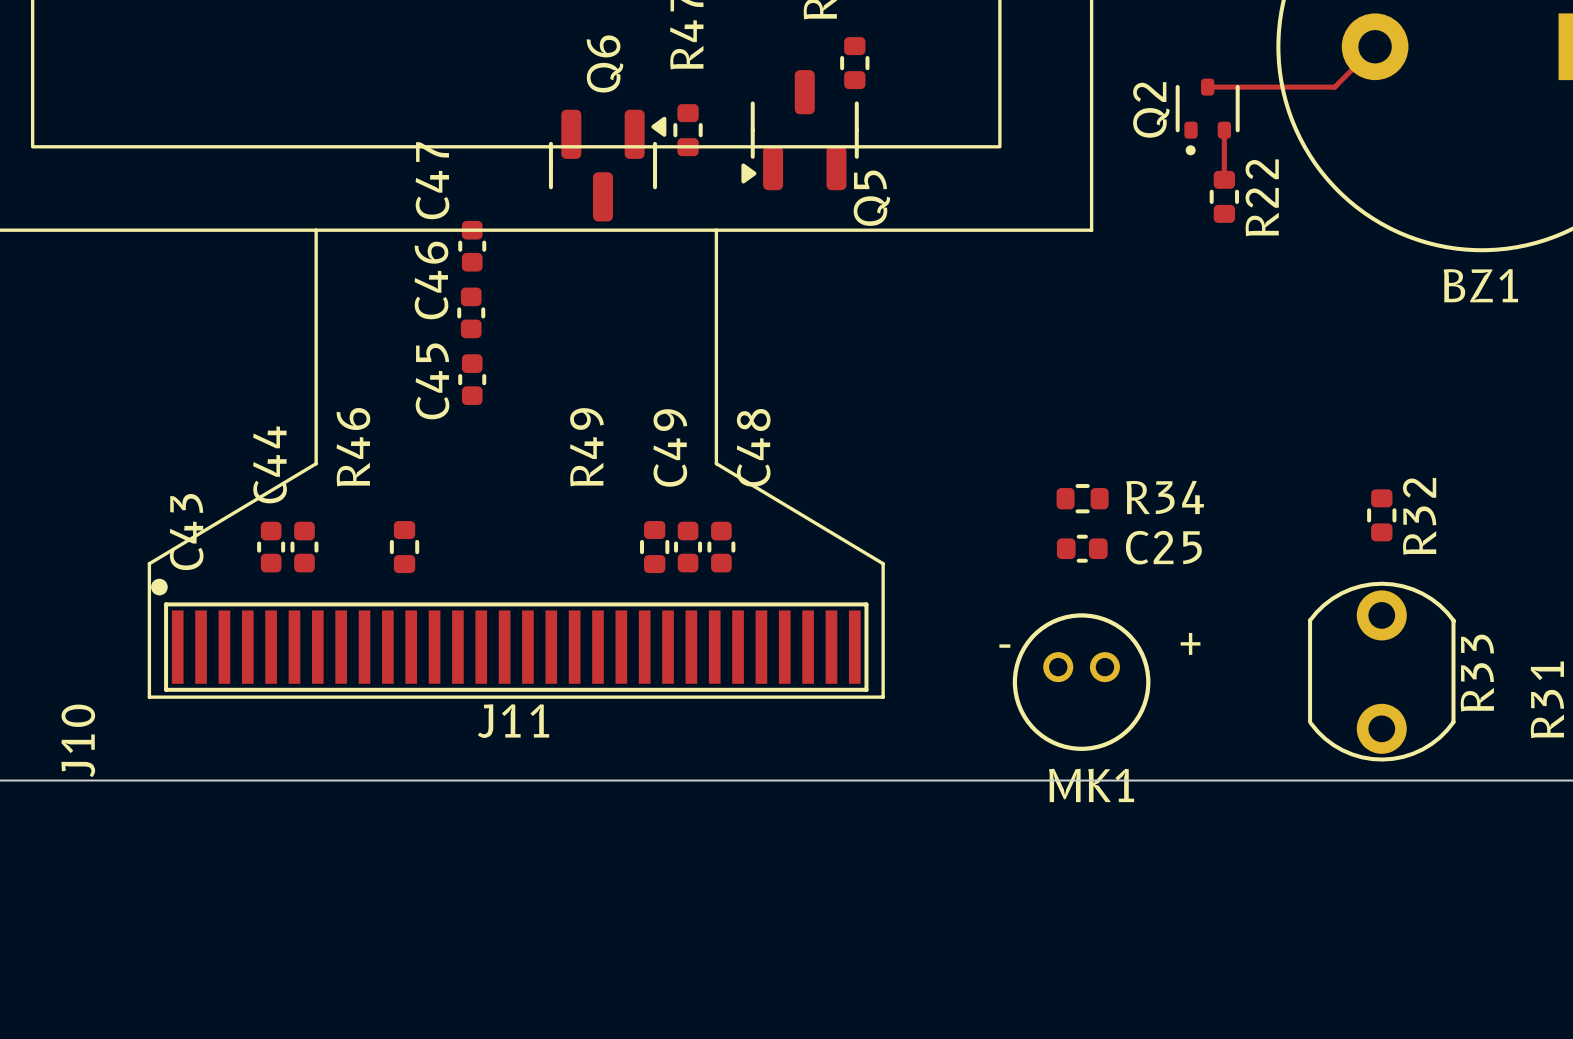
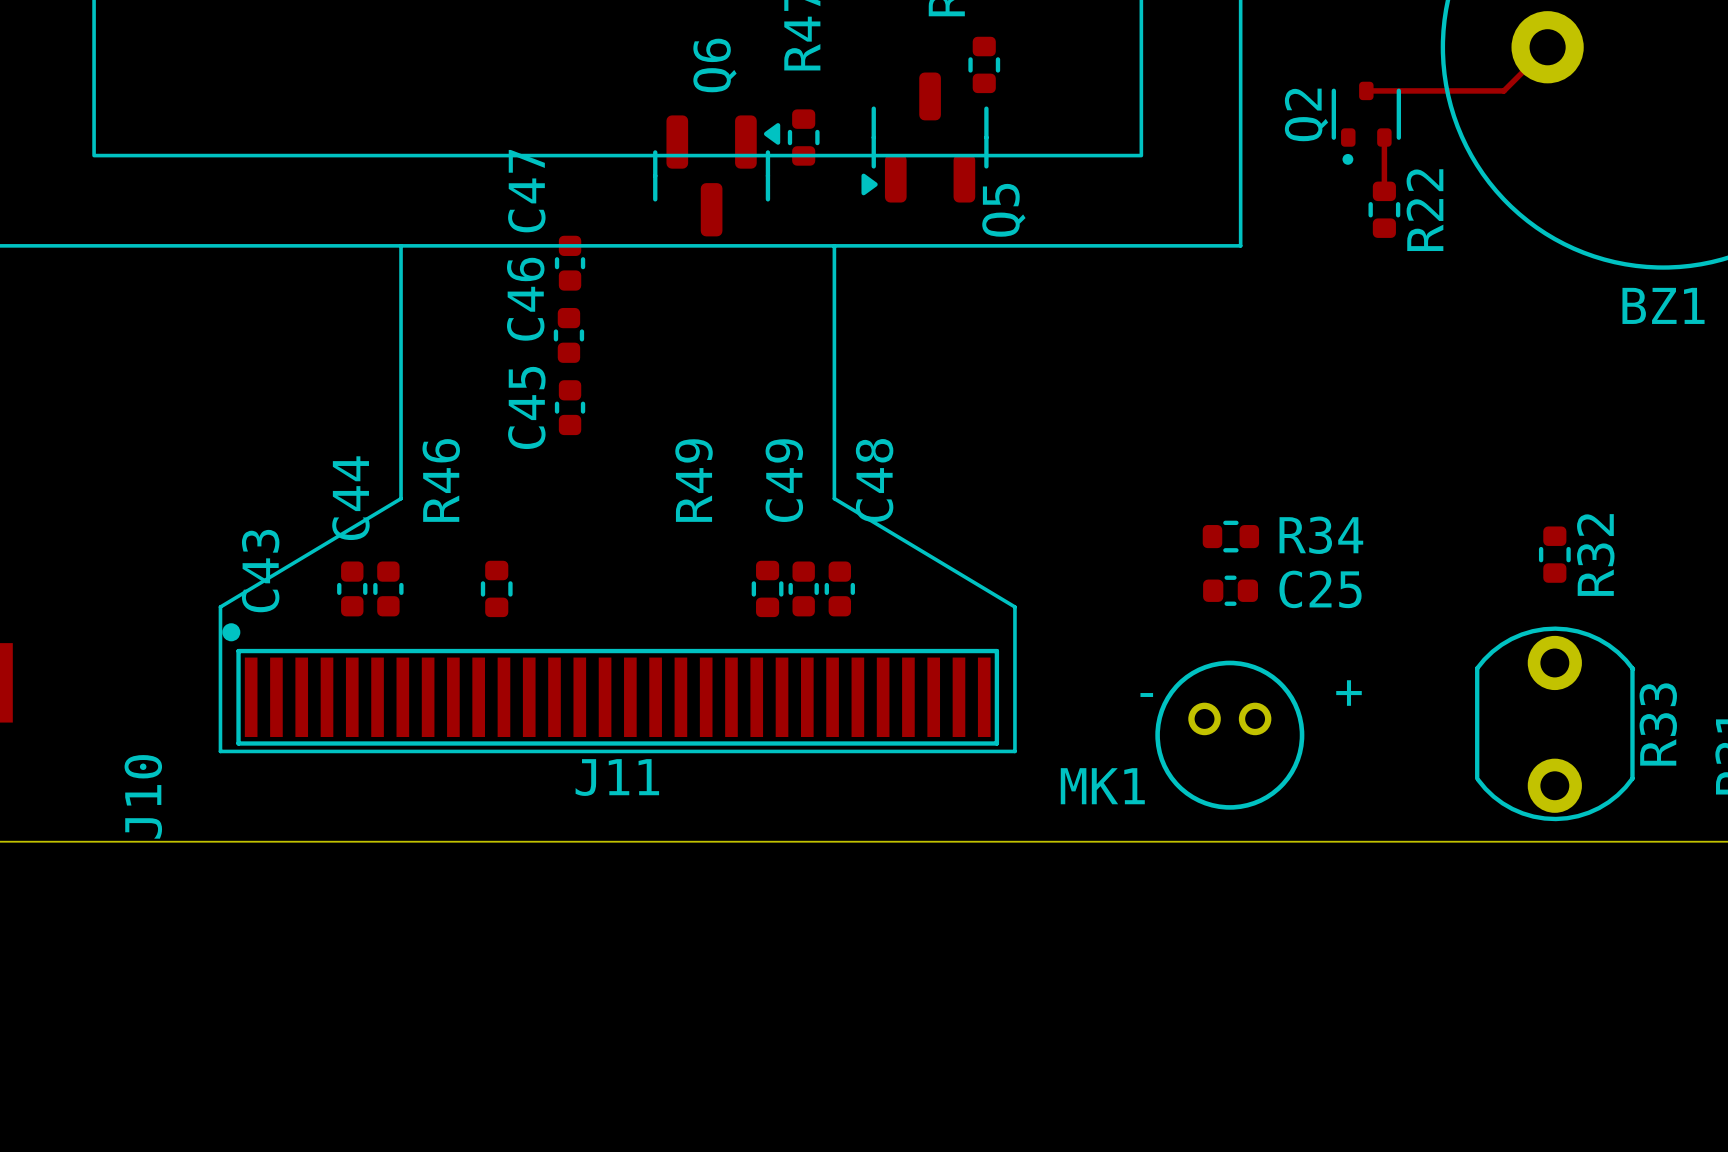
MK1 name position: MK1 (1091, 785) -> MK1 (1102, 786)

